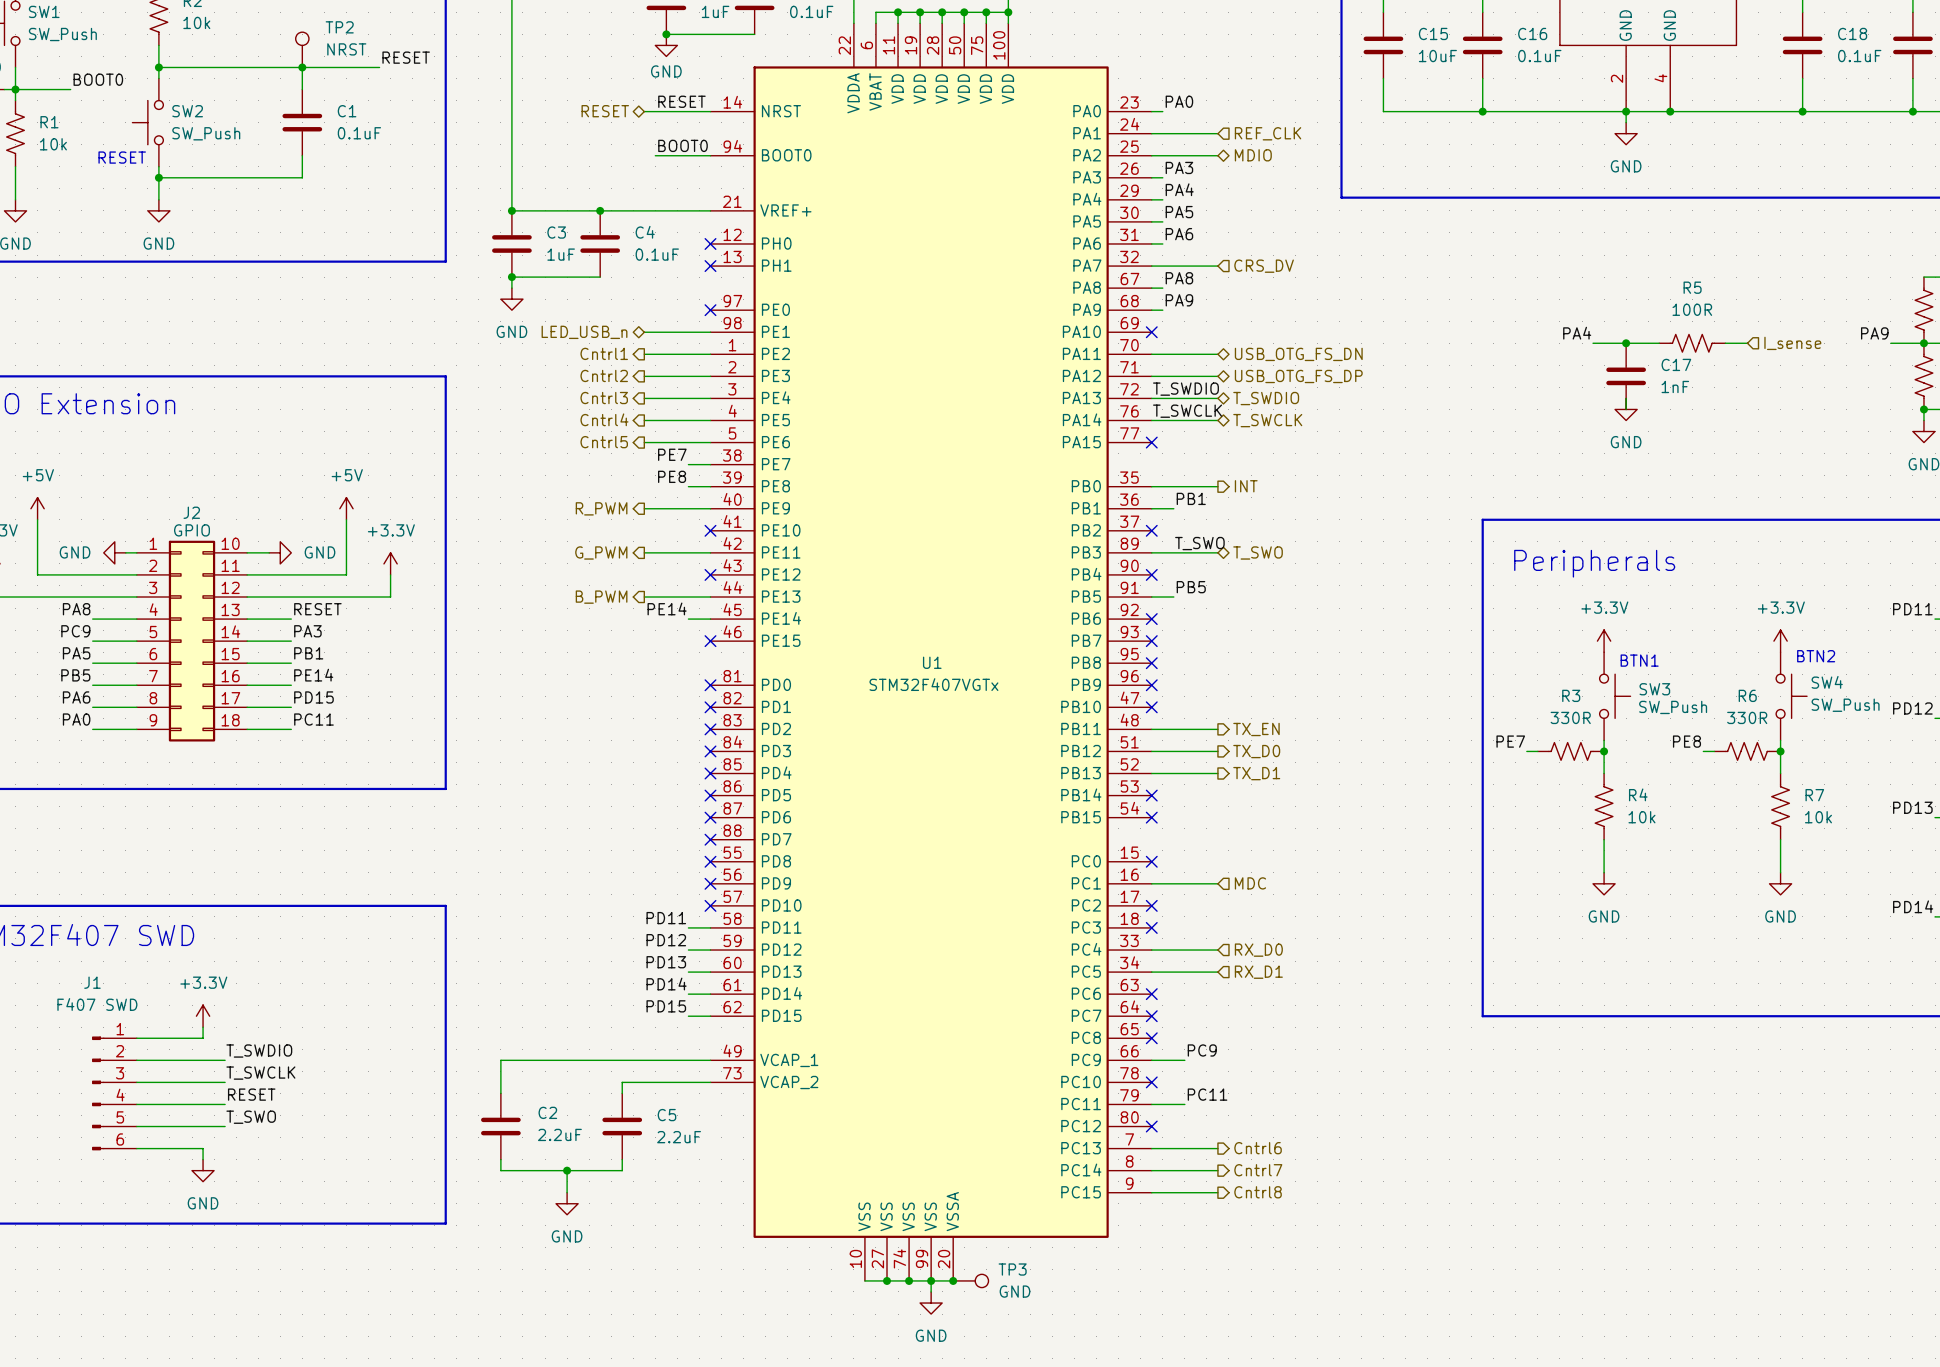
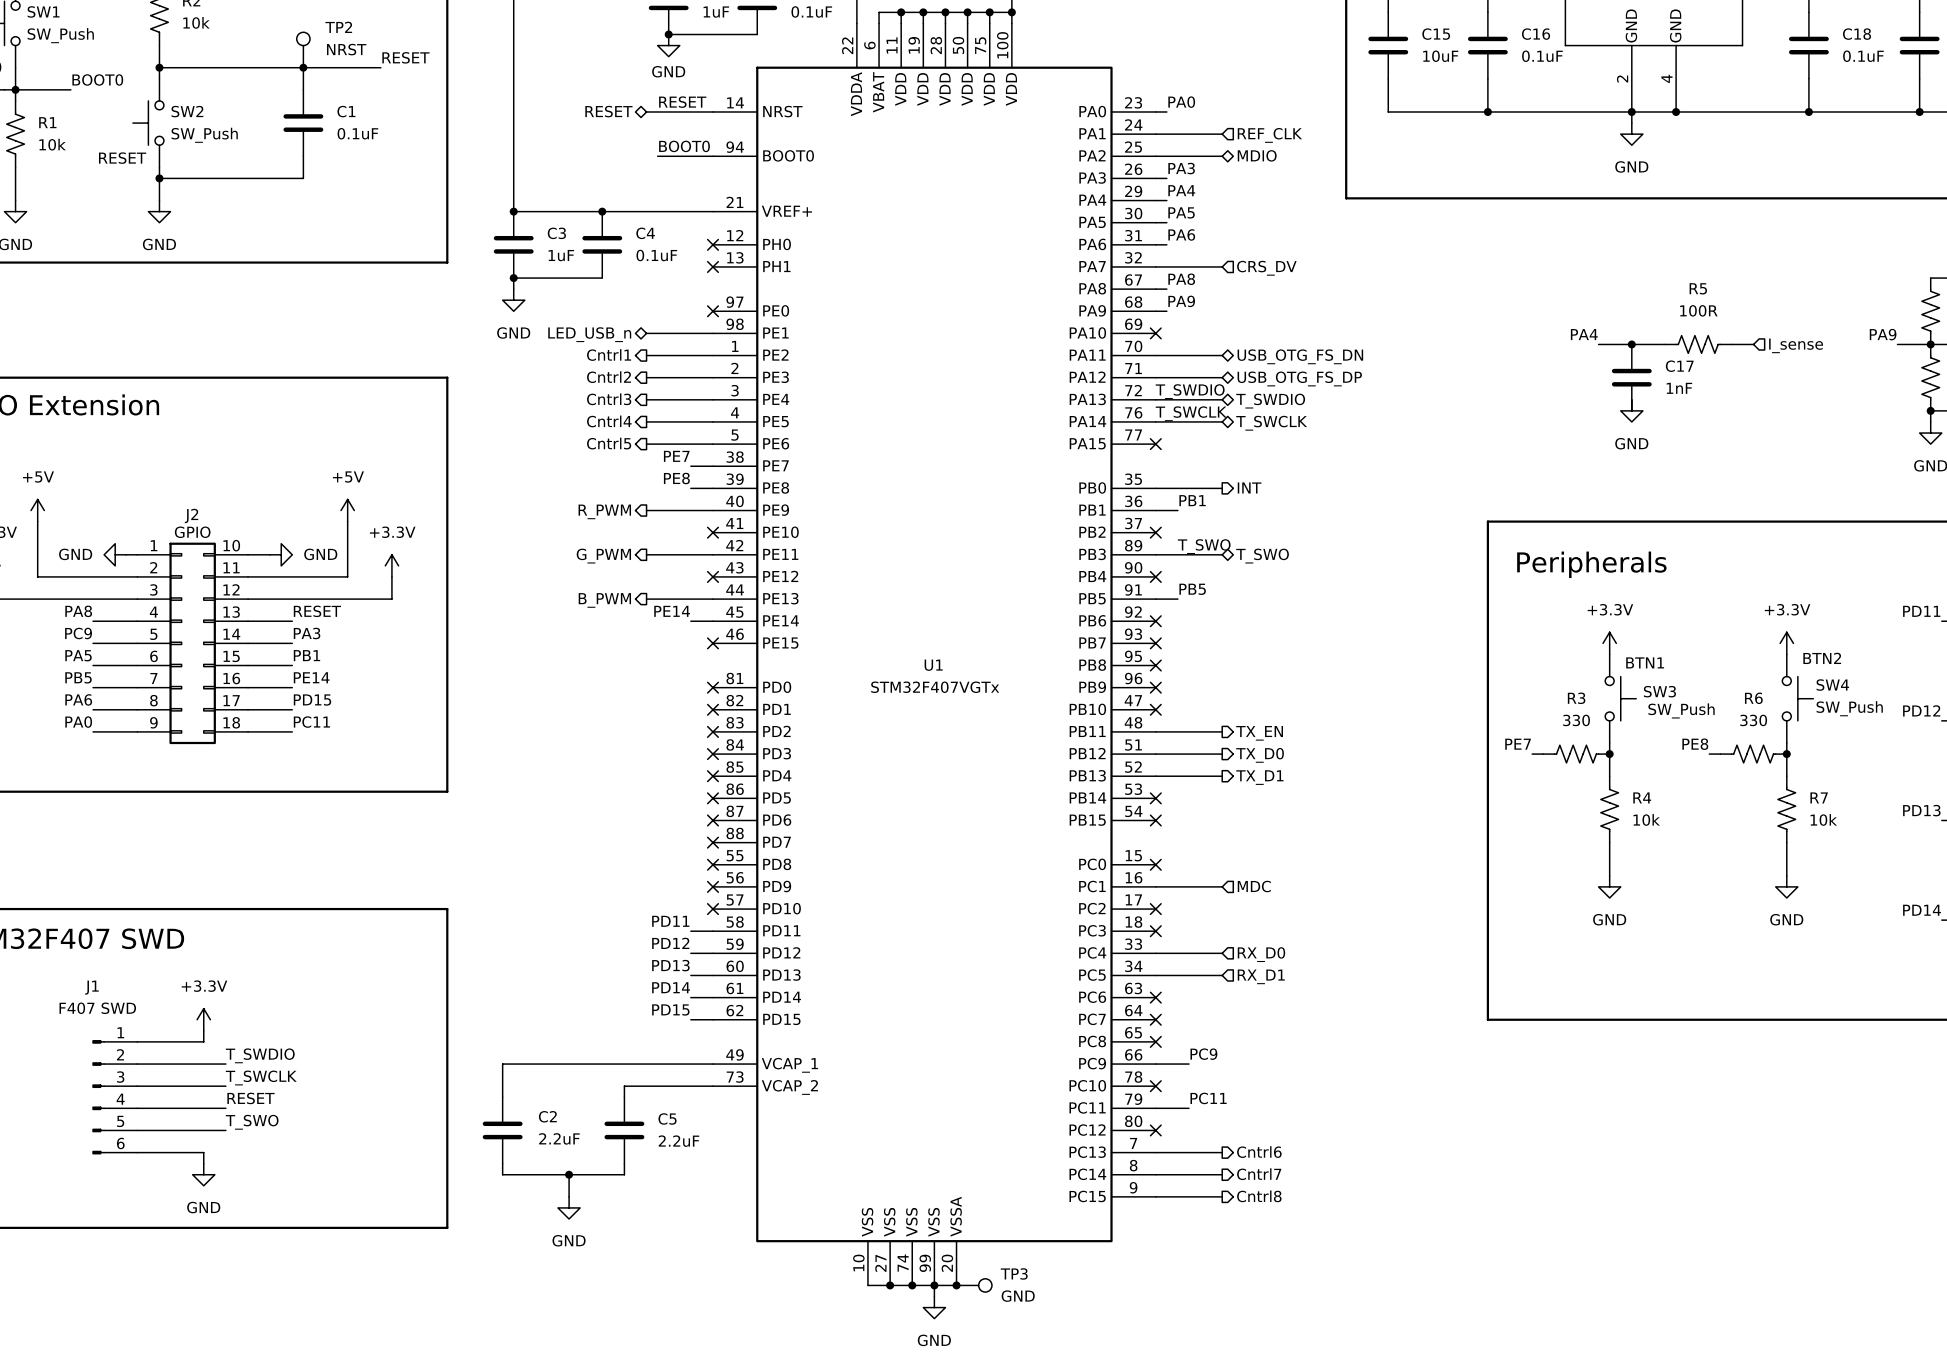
R3 value: 330R (1570, 717) -> 330 (1576, 720)
R6 value: 330R (1747, 717) -> 330 (1753, 720)

